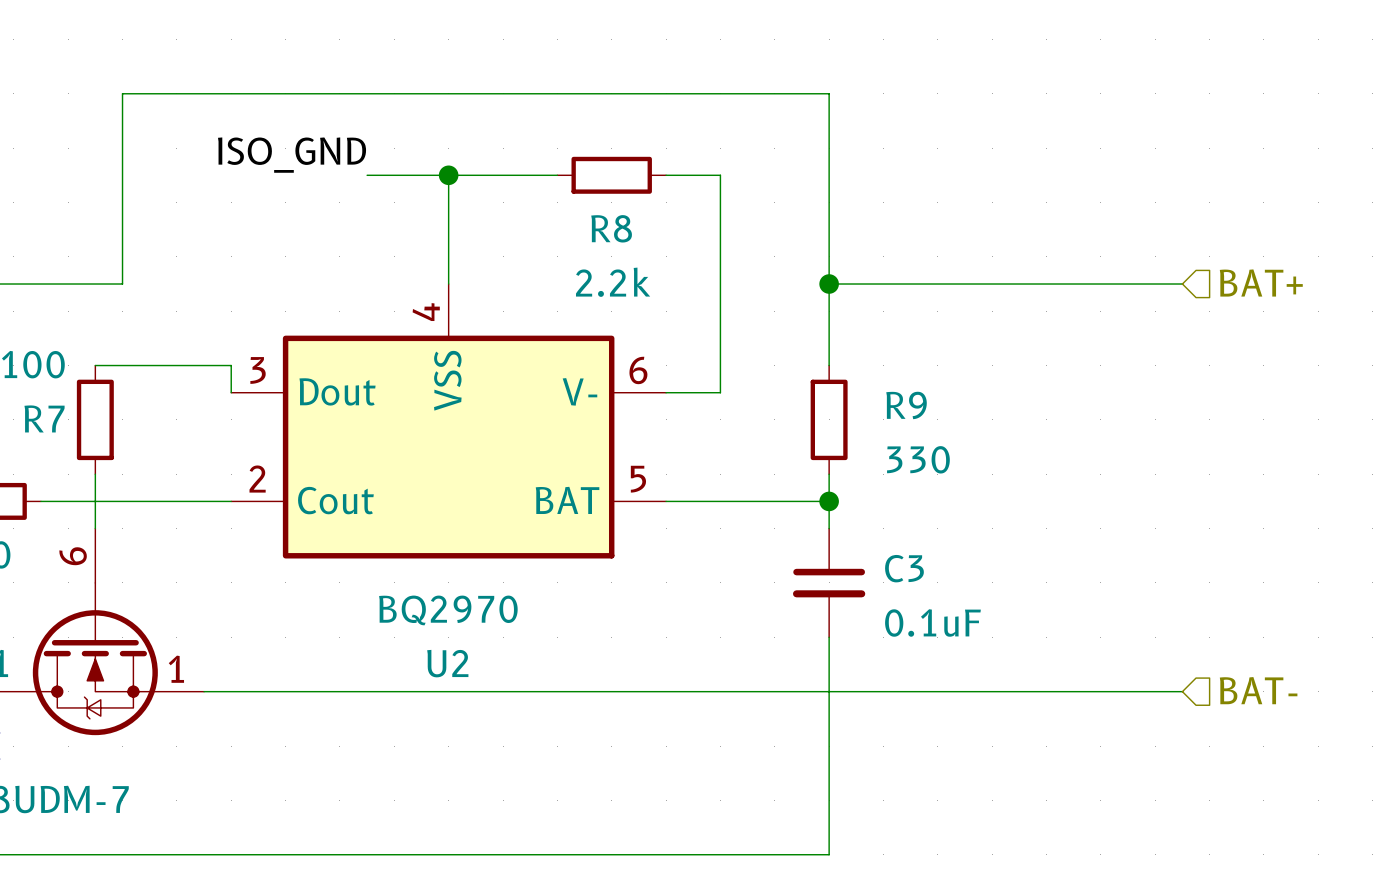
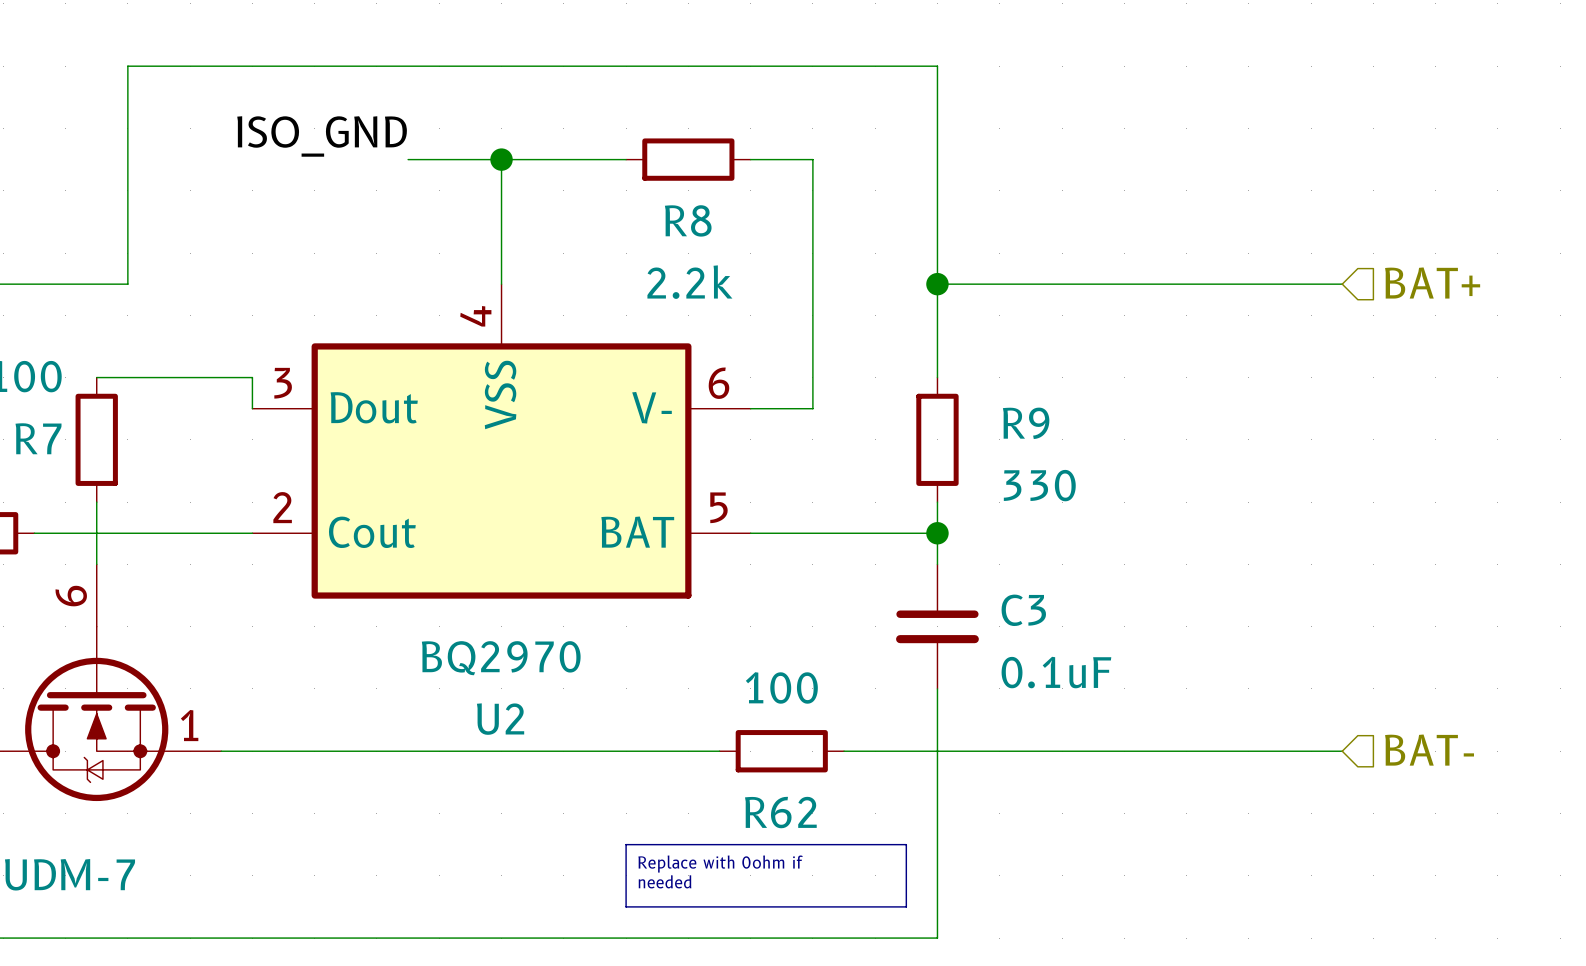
wire: (638, 691) (747, 691) -> none
R62: none -> 100 (781, 751)
line: none -> (626, 844) (906, 844) (906, 906) (626, 906) (626, 844)
text: none -> Replace with 0ohm if (720, 864)
text: none -> needed (665, 881)

